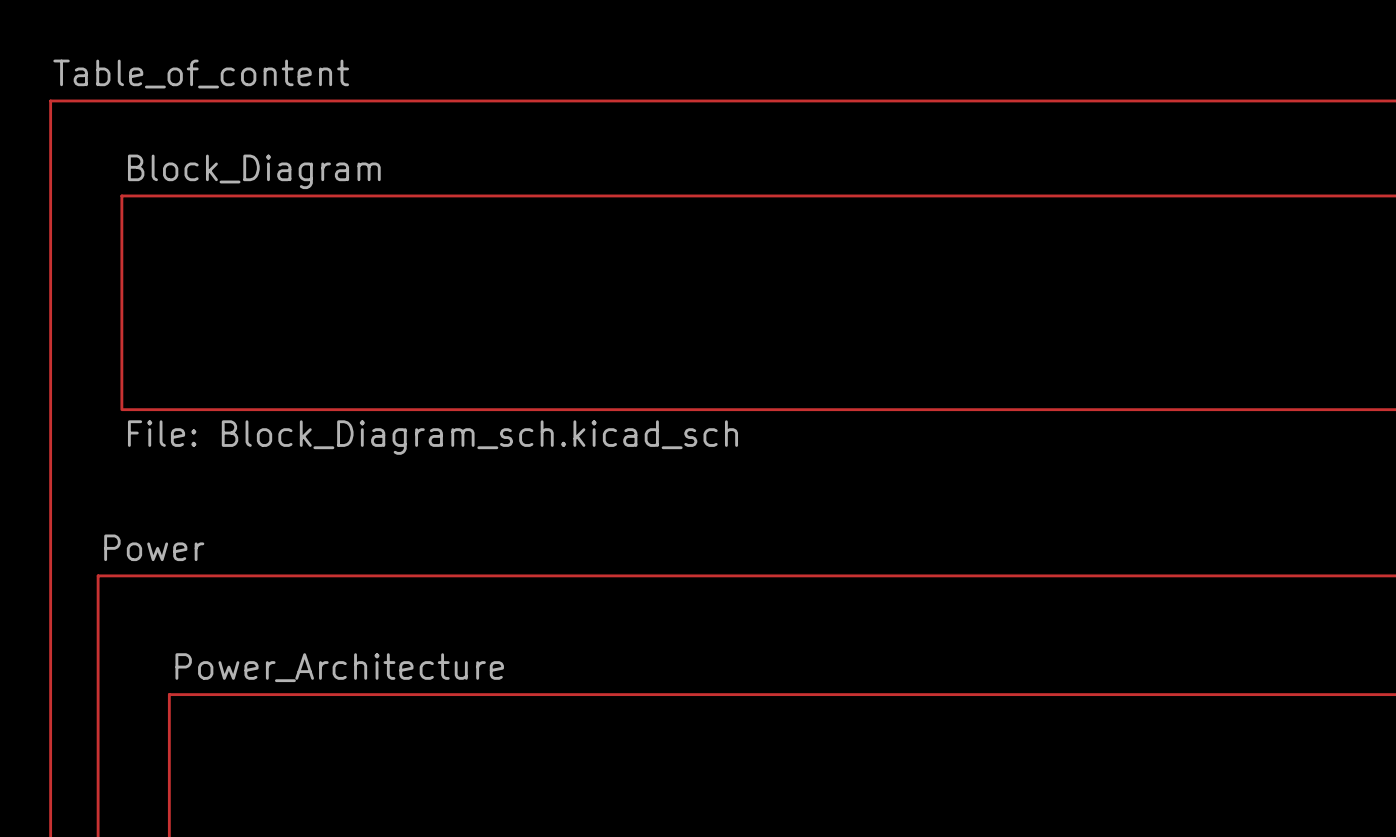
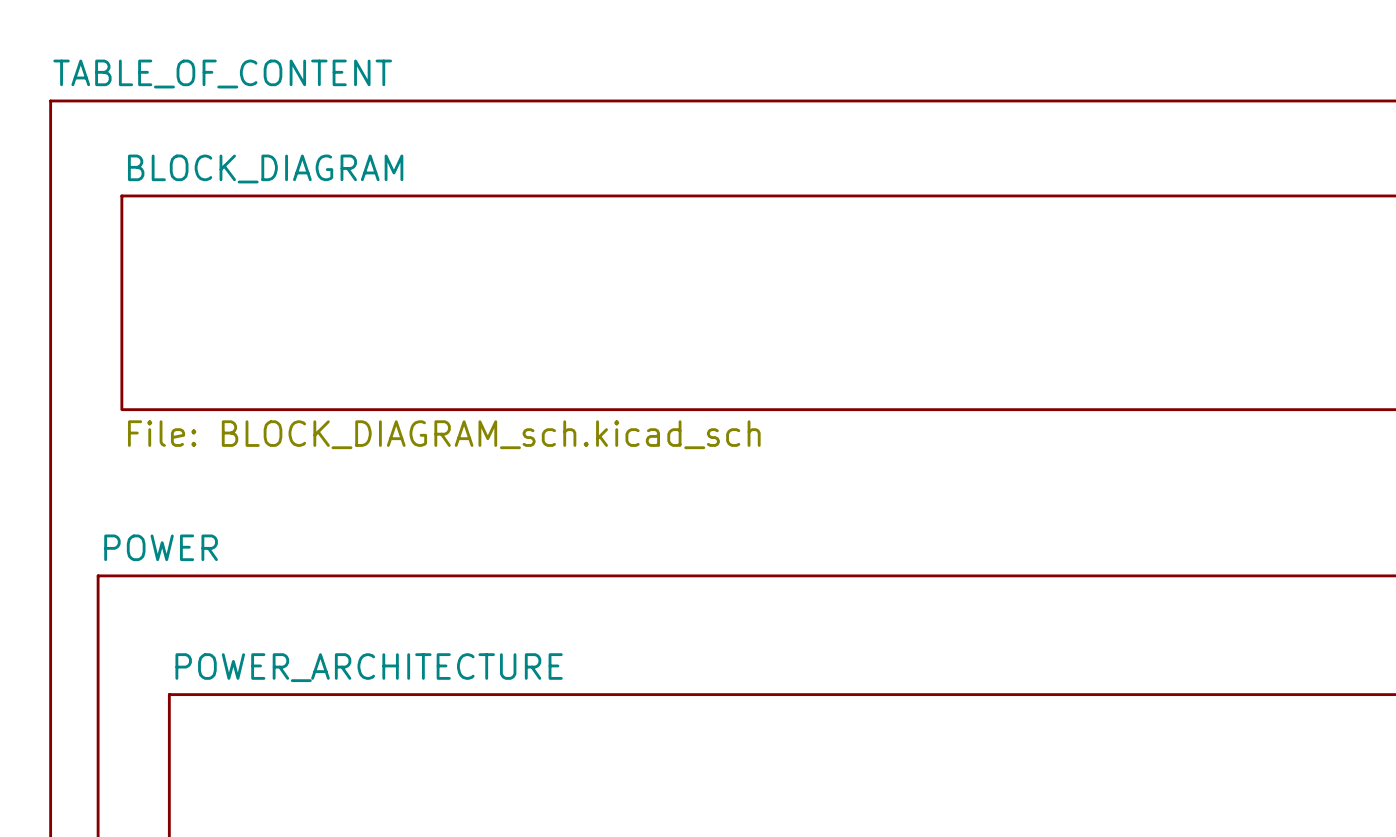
sheet Table_of_content name: Table_of_content (201, 74) -> TABLE_OF_CONTENT (222, 74)
sheet Block_Diagram name: Block_Diagram (254, 171) -> BLOCK_DIAGRAM (265, 169)
sheet Block_Diagram value: File: Block_Diagram_sch.kicad_sch (432, 437) -> File: BLOCK_DIAGRAM_sch.kicad_sch (444, 434)
sheet Power name: Power (154, 547) -> POWER (161, 547)
sheet Power_Architecture name: Power_Architecture (339, 667) -> POWER_ARCHITECTURE (369, 667)

